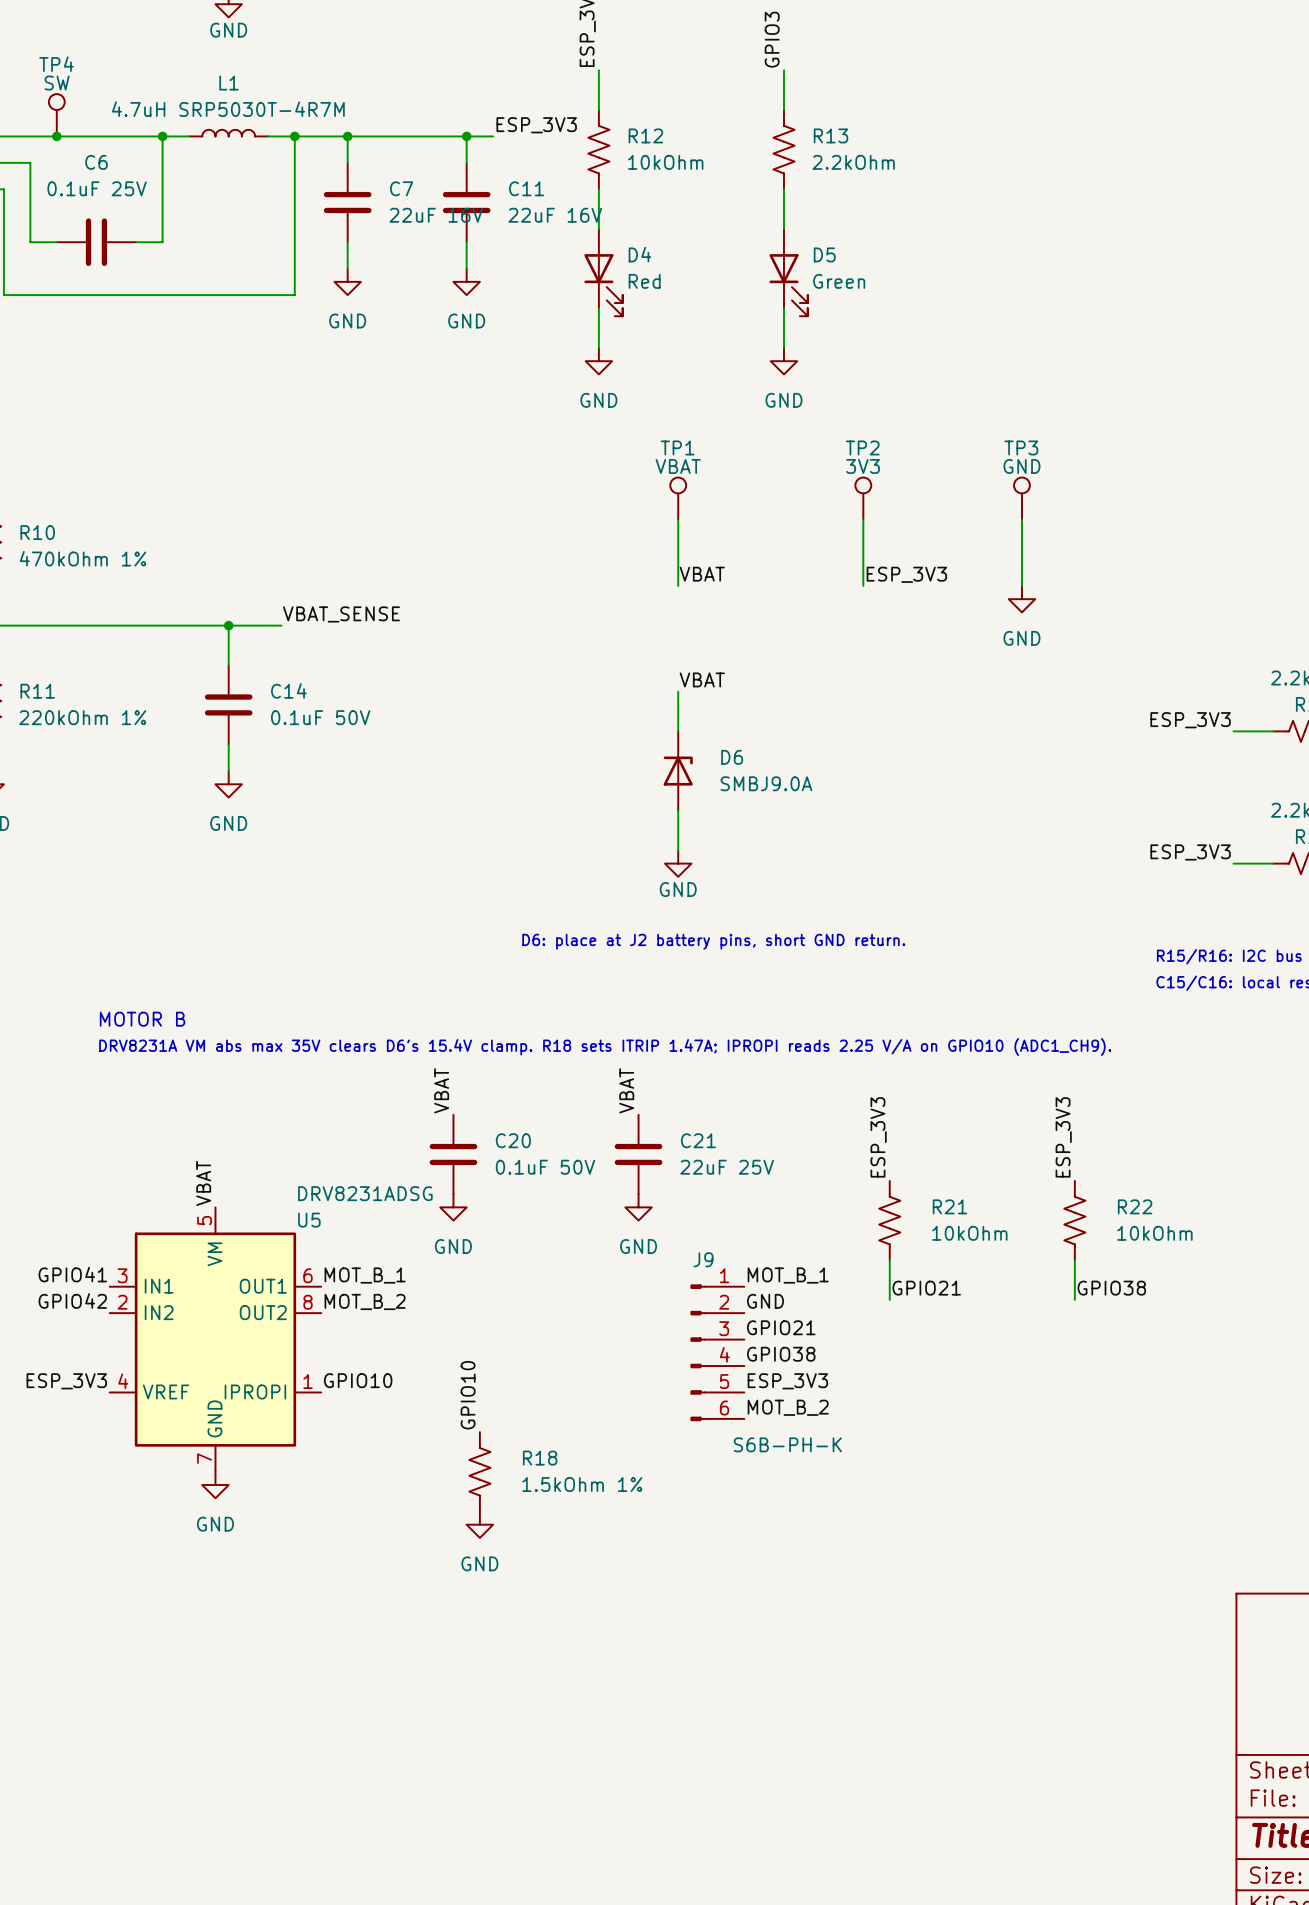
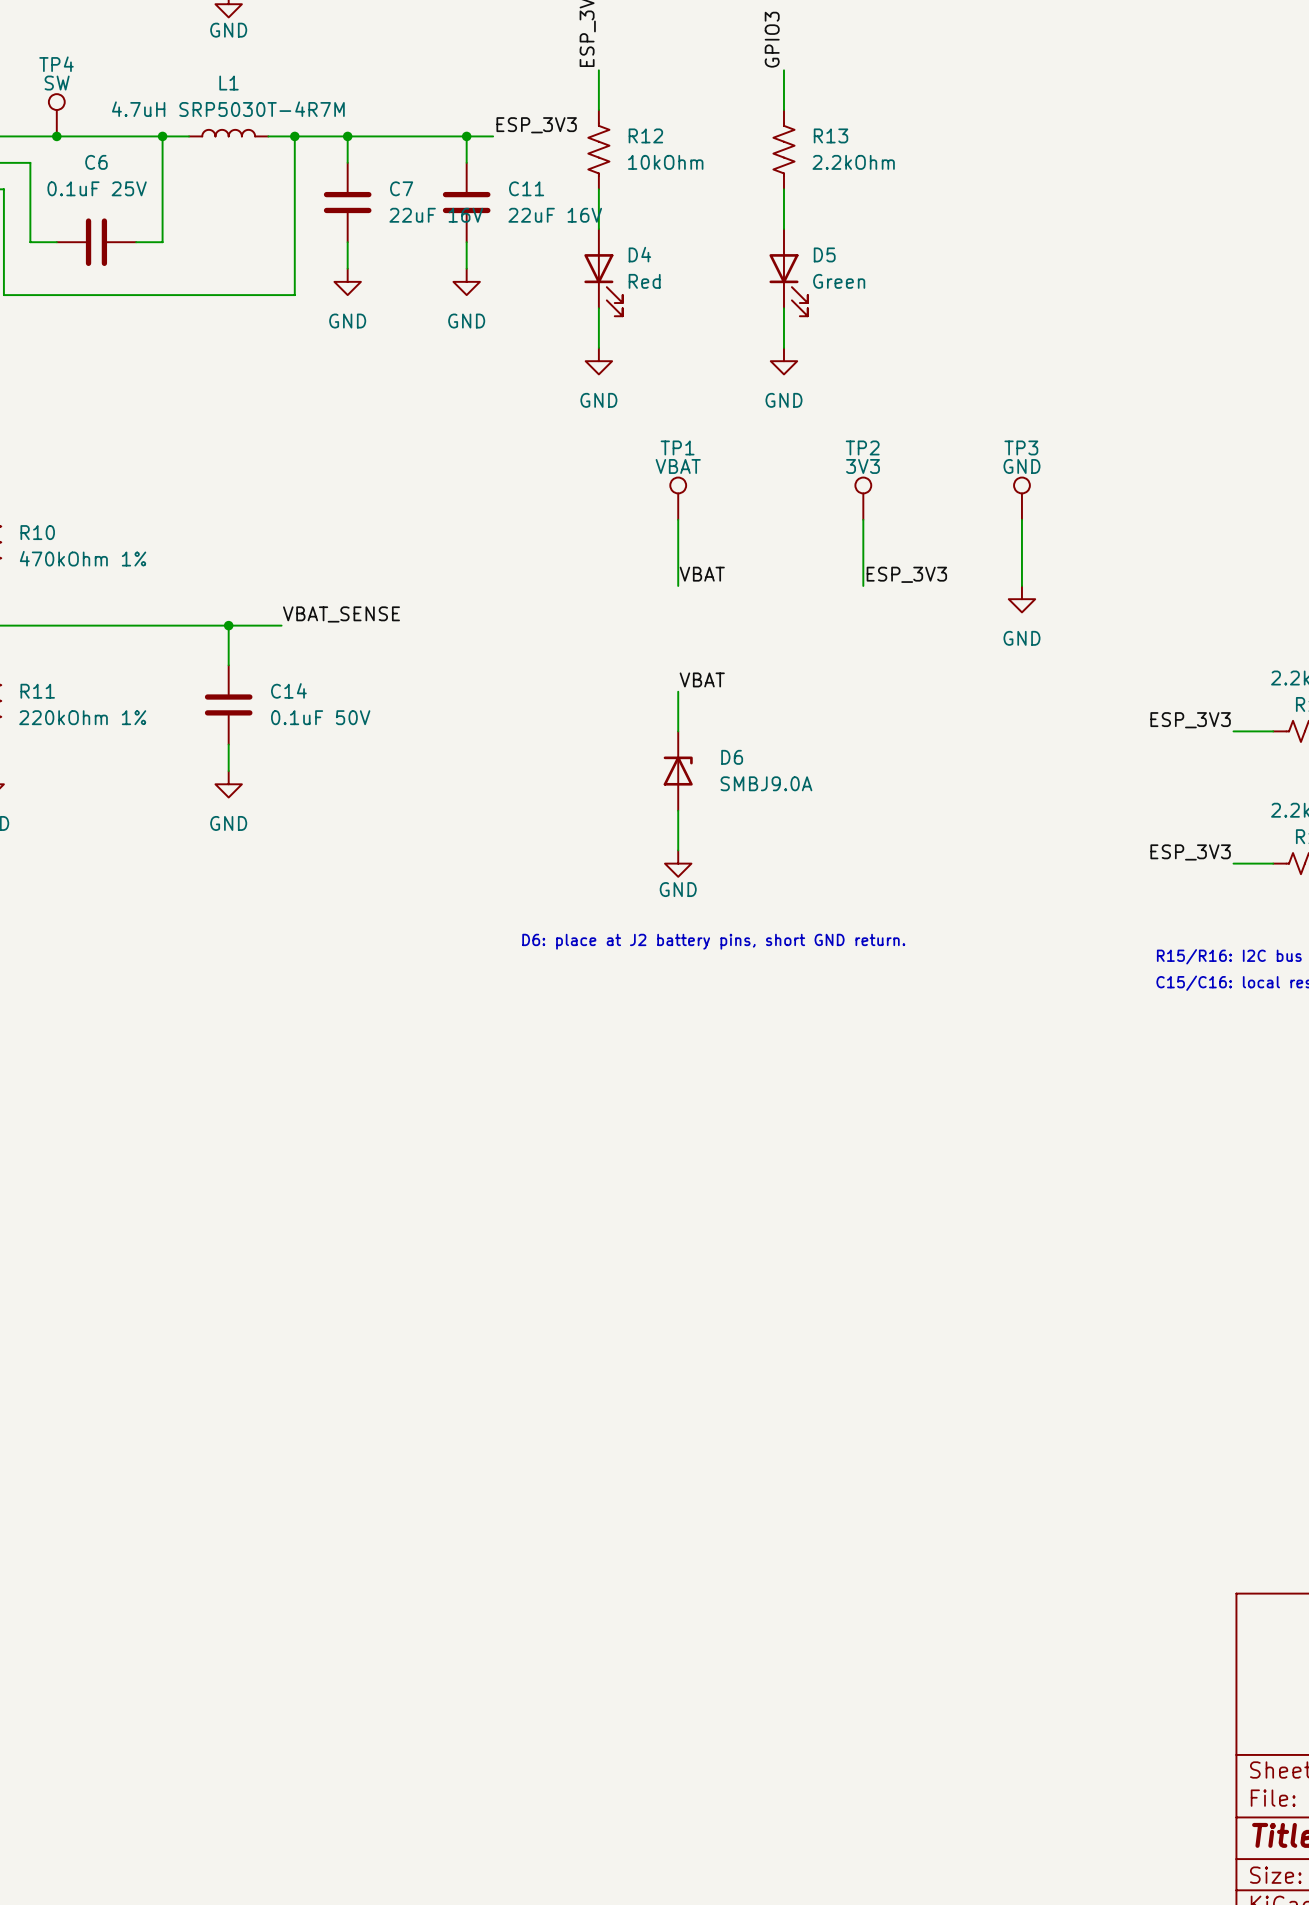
text: MOTOR B (142, 1019) -> none
text: DRV8231A VM abs max 35V clears D6's 15.4V clamp. R18 sets ITRIP 1.47A; IPROPI reads 2.25 V/A on GPIO10 (ADC1_CH9). (605, 1046) -> none
label: VBAT (441, 1090) -> none
label: VBAT (626, 1090) -> none
label: ESP_3V3 (878, 1137) -> none
label: ESP_3V3 (1063, 1137) -> none
C20: 0.1uF 50V (453, 1154) -> none
C21: 22uF 25V (638, 1154) -> none
label: VBAT (203, 1183) -> none
power symbol: GND (453, 1207) -> none
power symbol: GND (638, 1207) -> none
R21: 10kOhm (889, 1220) -> none
R22: 10kOhm (1074, 1220) -> none
wire: (889, 1260) (889, 1299) -> none
wire: (1074, 1260) (1074, 1299) -> none
label: GPIO41 (72, 1274) -> none
label: MOT_B_1 (365, 1275) -> none
label: MOT_B_1 (788, 1275) -> none
label: GPIO21 (926, 1288) -> none
label: GPIO38 (1111, 1288) -> none
label: GPIO42 (72, 1301) -> none
label: MOT_B_2 (365, 1301) -> none
label: GND (765, 1301) -> none
label: GPIO21 (781, 1327) -> none
U5: DRV8231ADSG (215, 1339) -> none
J9: S6B-PH-K (717, 1352) -> none
label: GPIO38 (781, 1354) -> none
label: GPIO10 (358, 1380) -> none
label: ESP_3V3 (66, 1381) -> none
label: ESP_3V3 (787, 1381) -> none
label: GPIO10 (468, 1395) -> none
label: MOT_B_2 (788, 1407) -> none
R18: 1.5kOhm 1% (479, 1471) -> none
power symbol: GND (215, 1485) -> none
power symbol: GND (479, 1524) -> none

